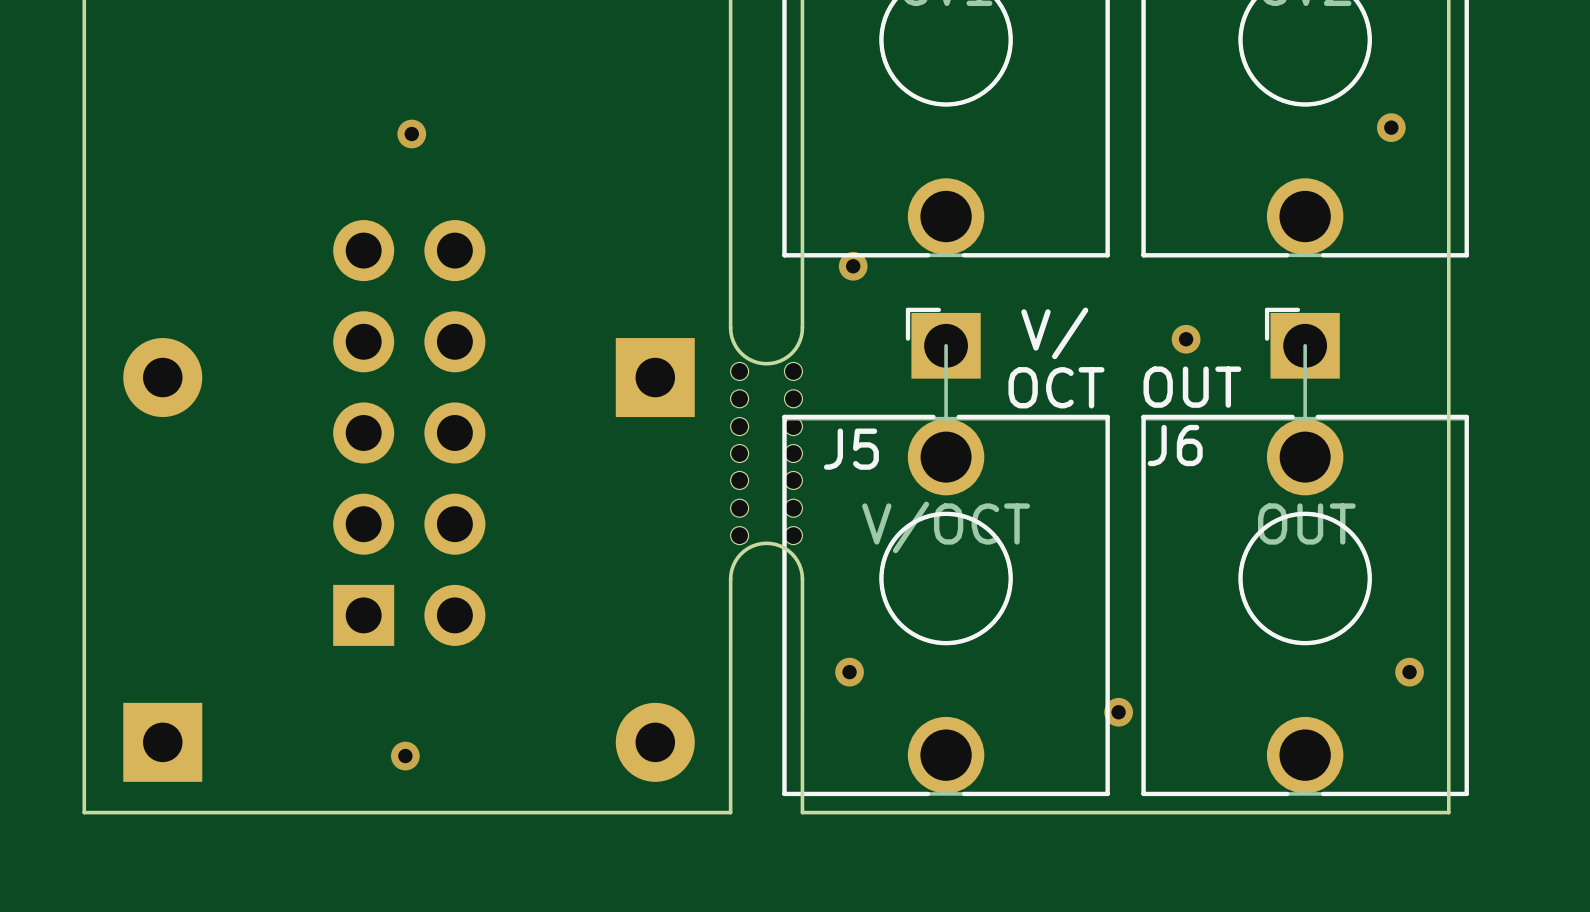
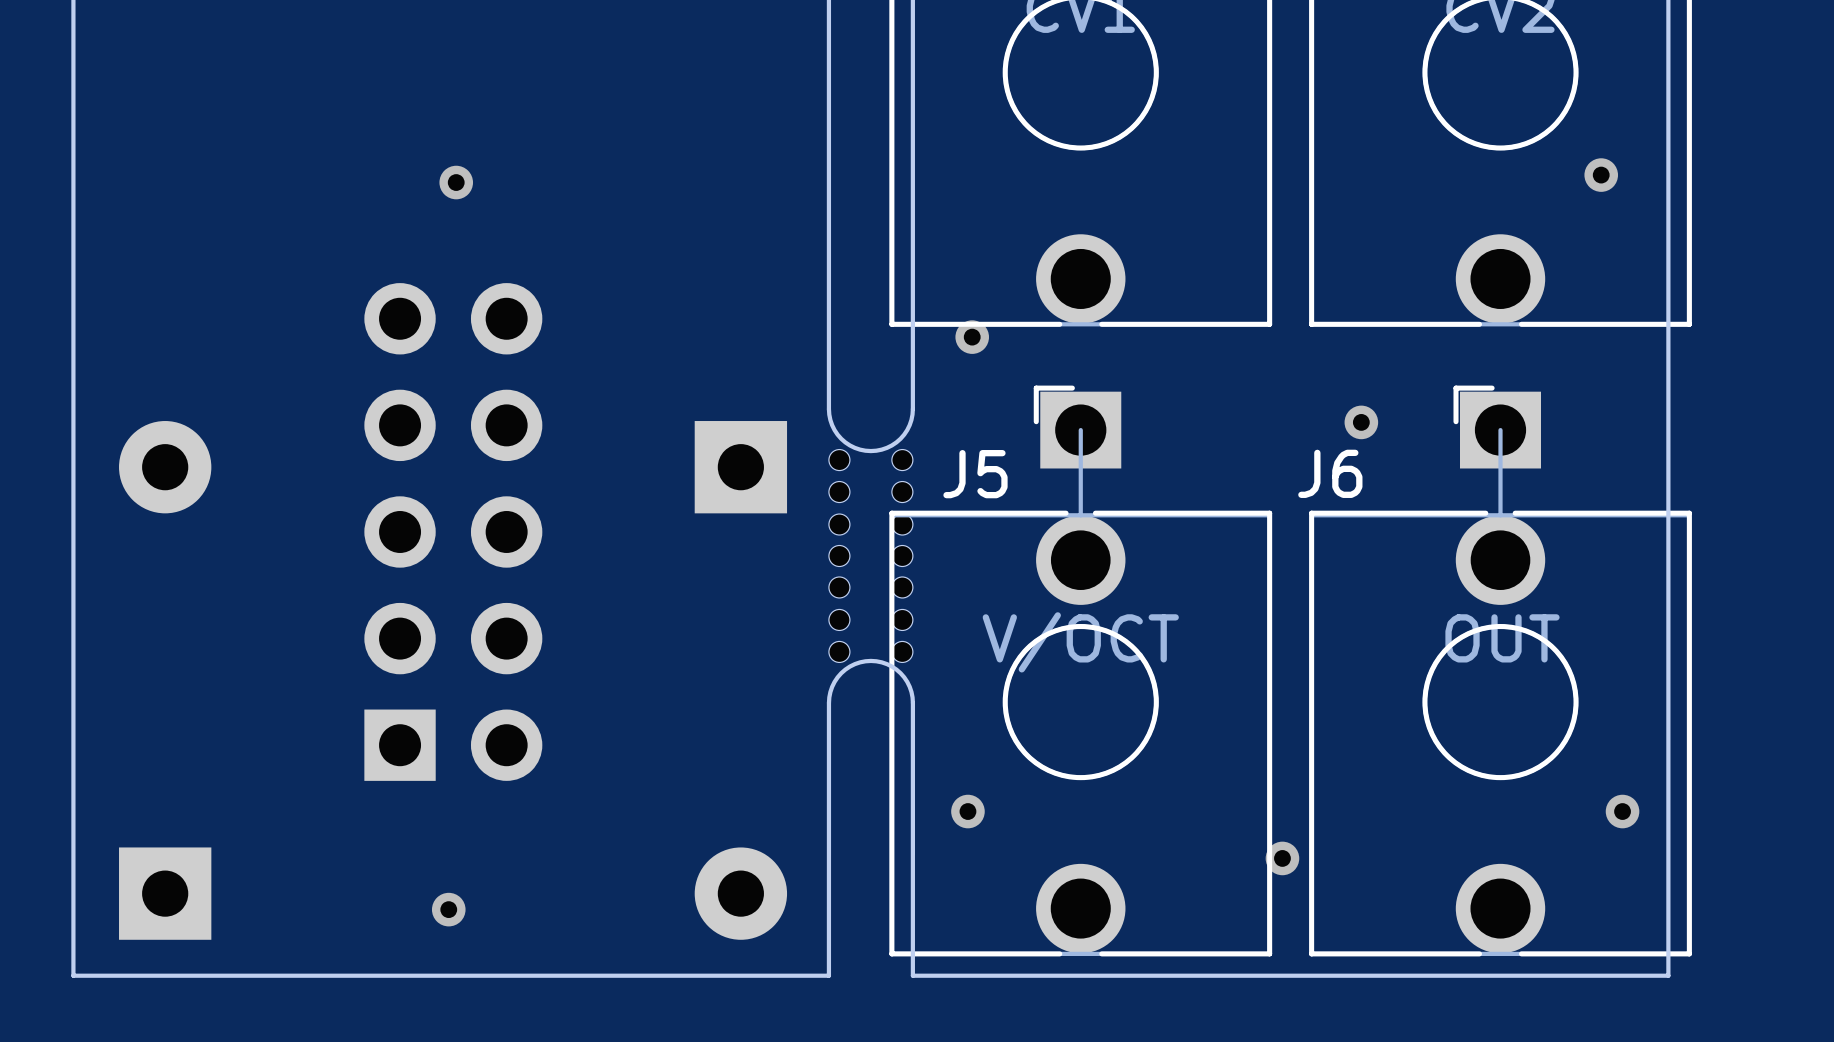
text: V/ (1054, 333) -> none
text: OCT (1056, 387) -> none
text: OUT (1192, 387) -> none
J6 name position: J6 (1175, 445) -> J6 (1330, 473)
J5 name position: J5 (851, 449) -> J5 (975, 474)

